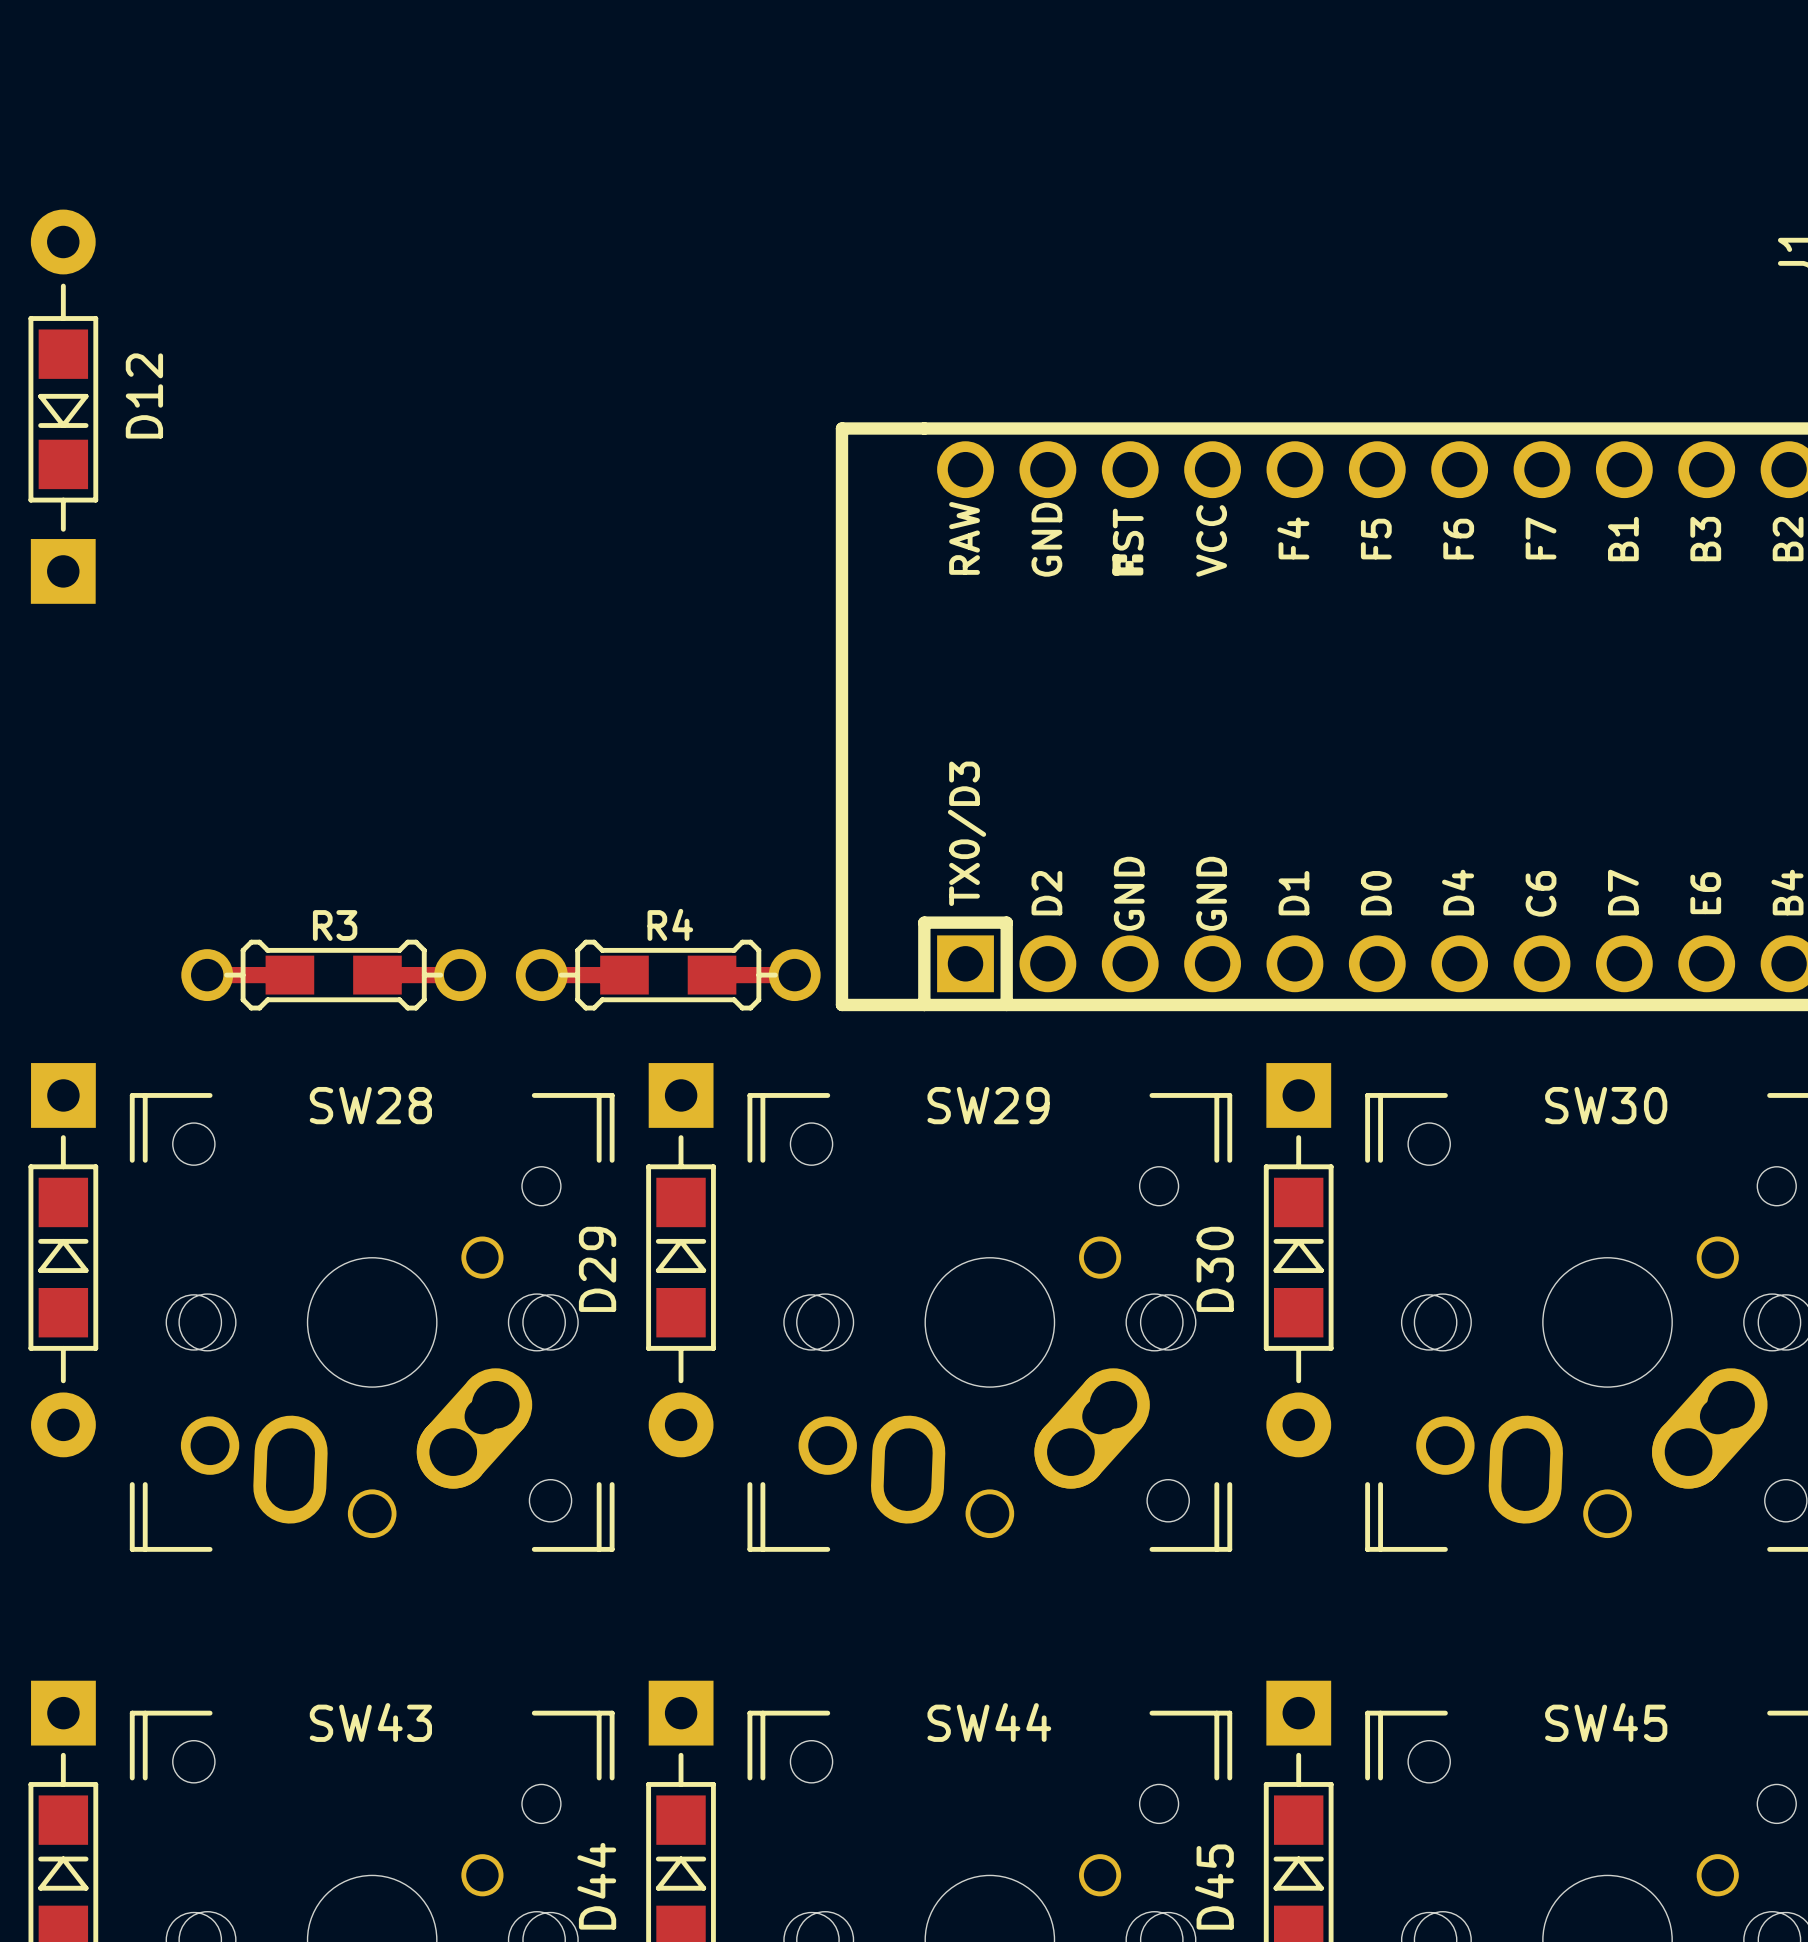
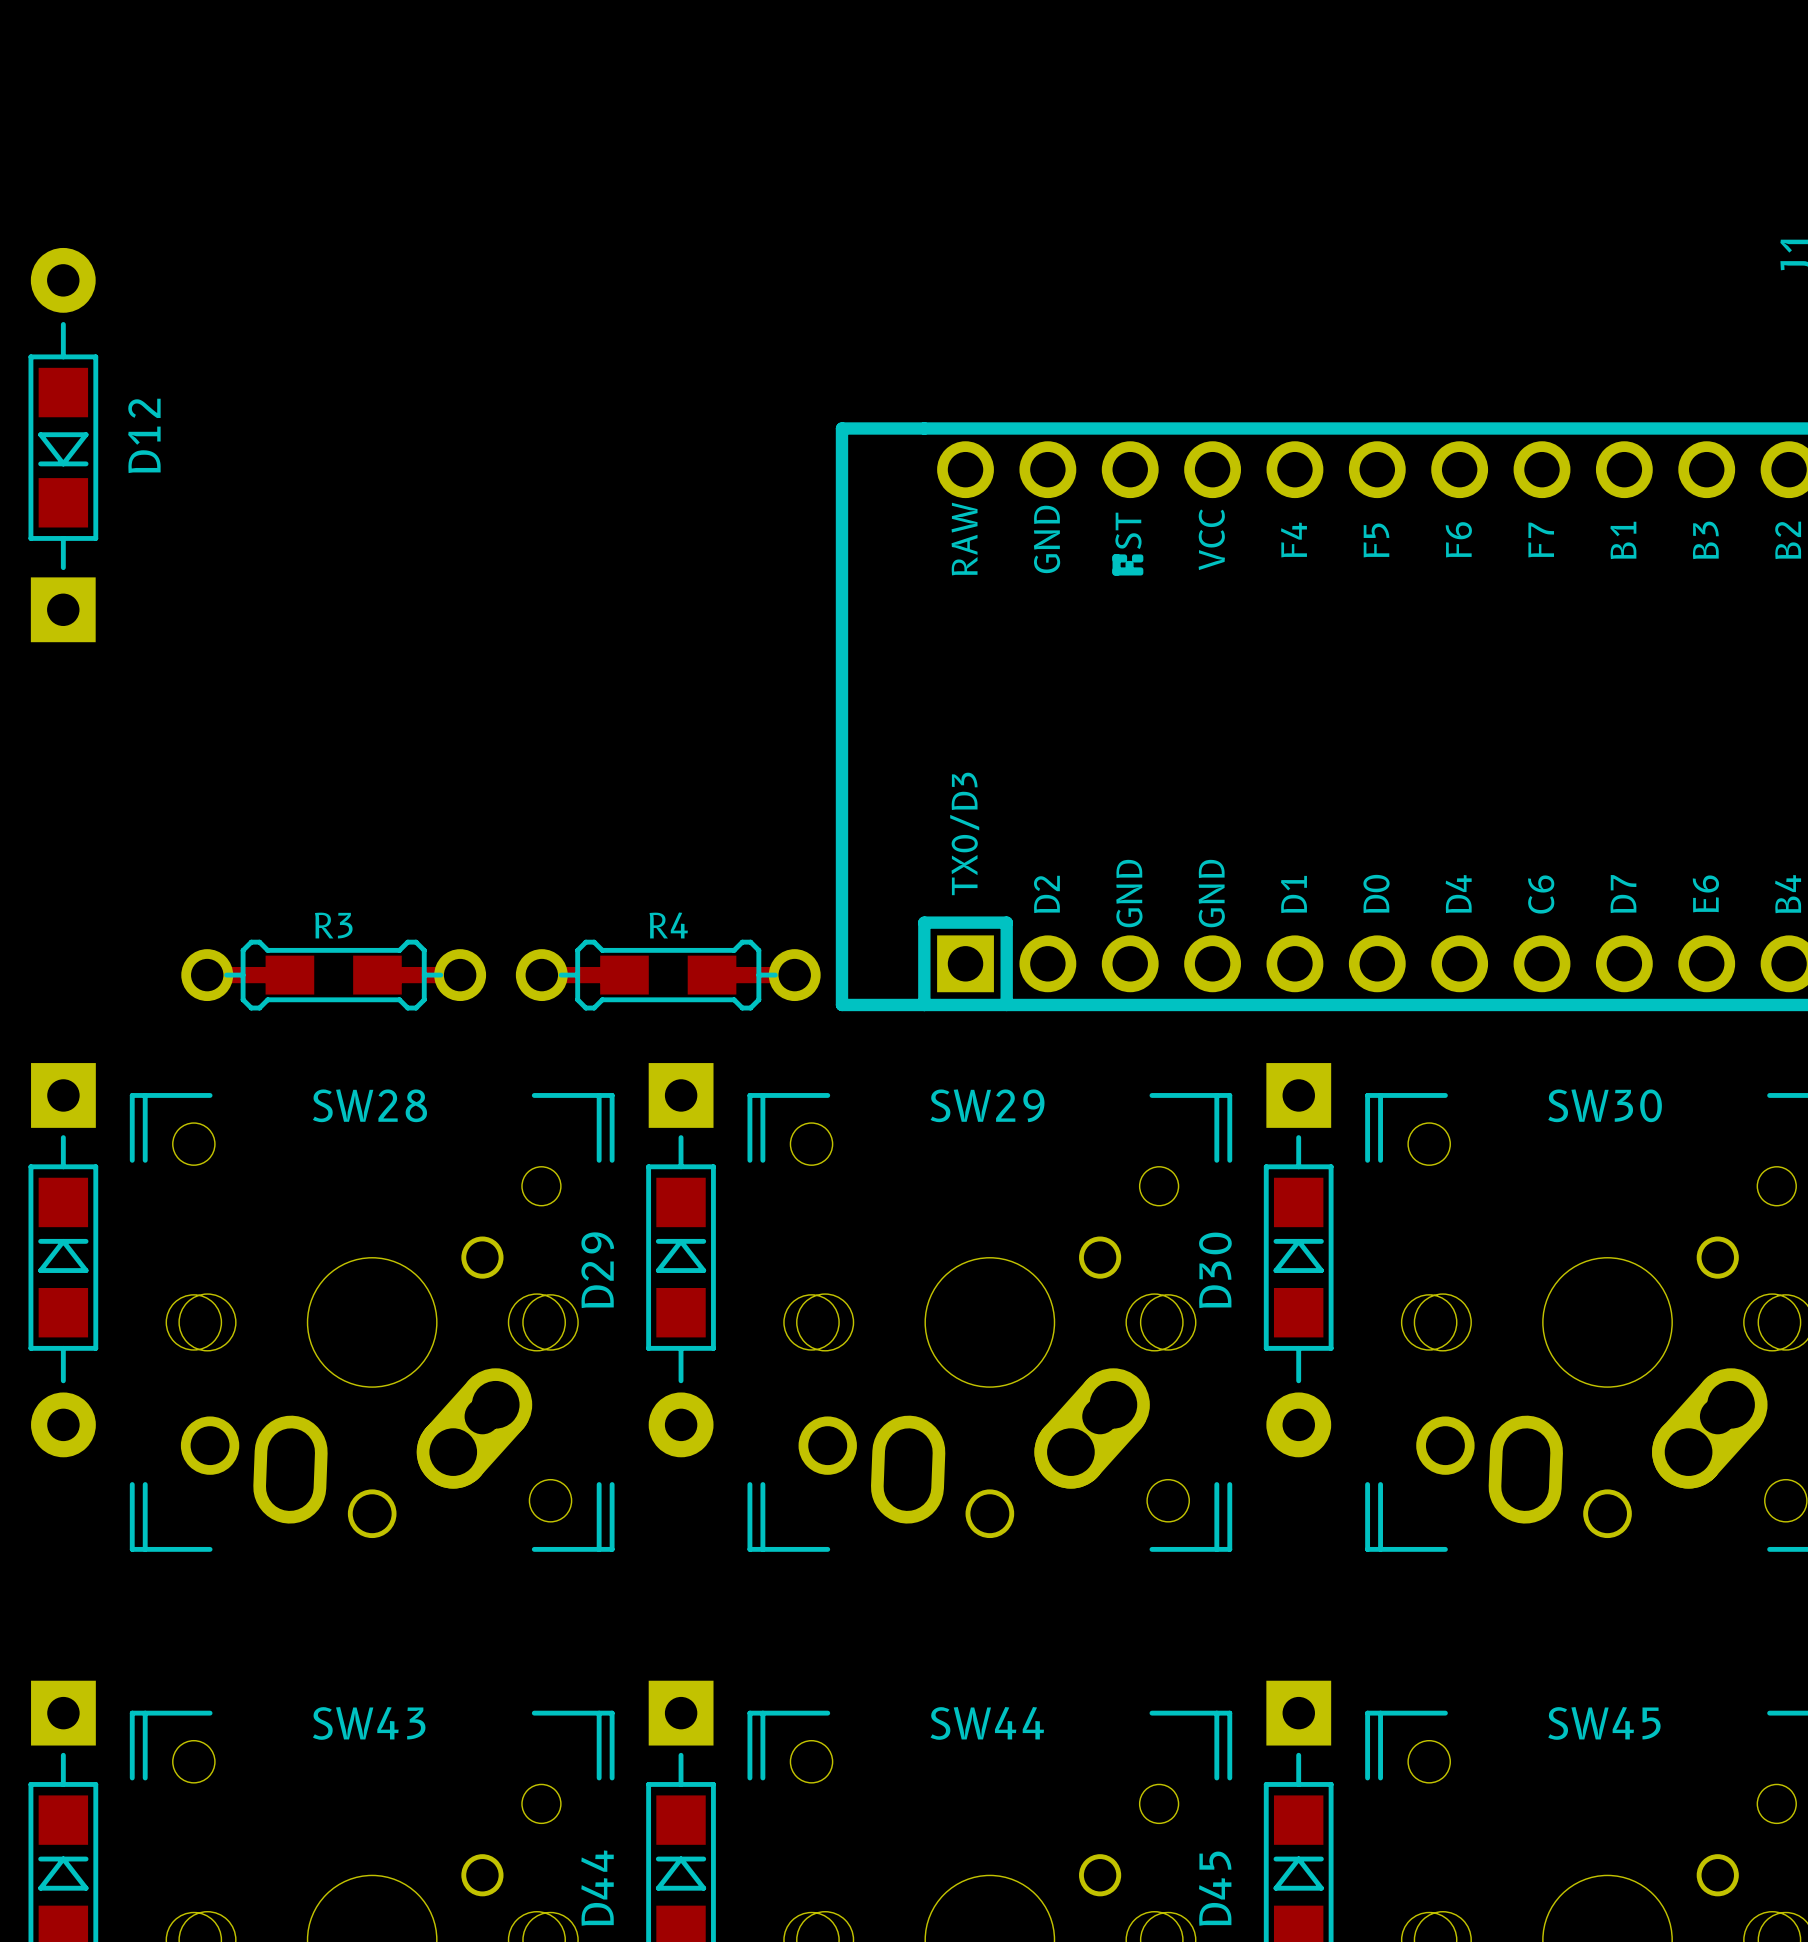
D12 position: (63, 406) -> (63, 445)

